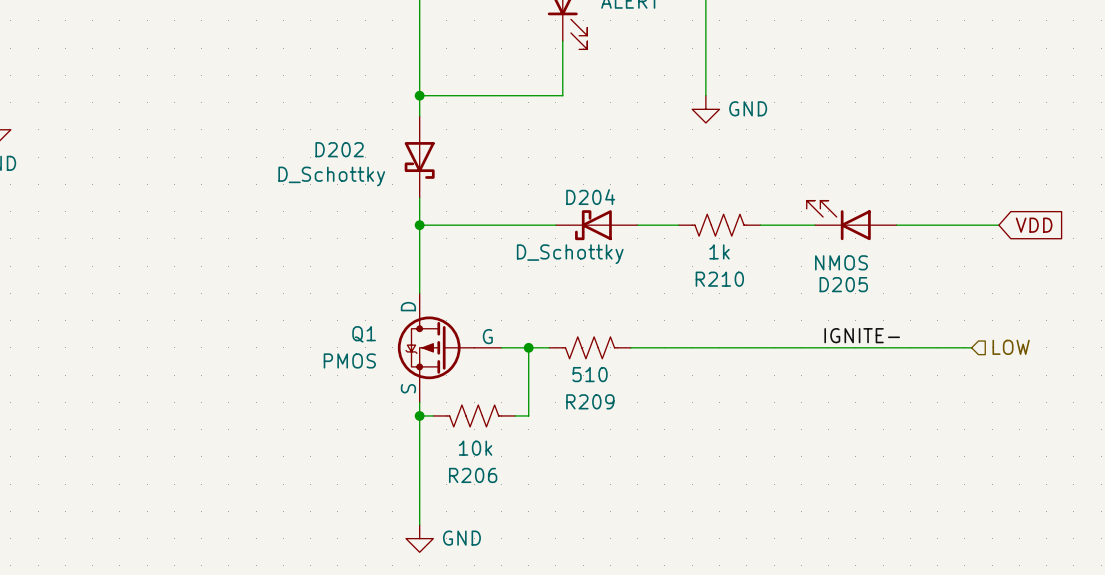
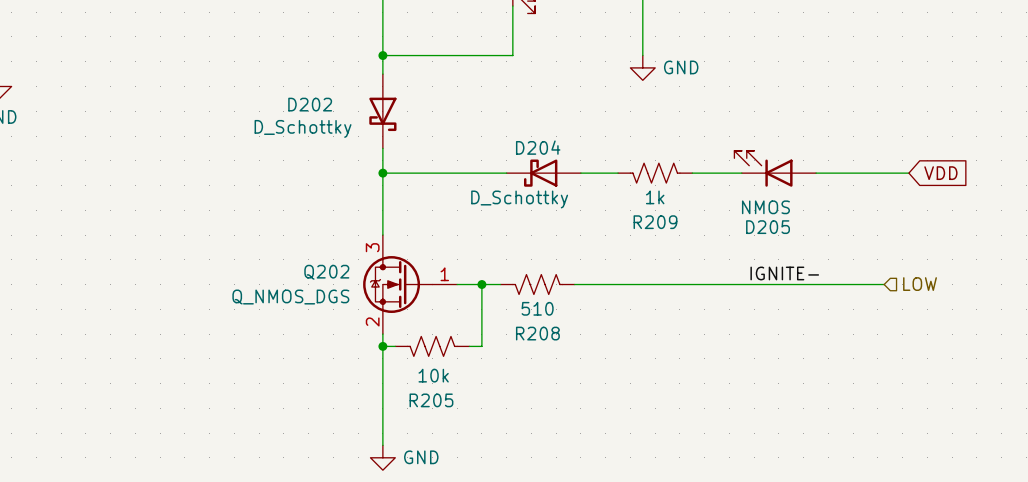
R210 name: R210 (719, 279) -> R209 (655, 222)
Q1: PMOS (449, 347) -> none
Q202: none -> Q_NMOS_DGS (410, 284)
R209 name: R209 (590, 401) -> R208 (537, 333)
R206 name: R206 (473, 475) -> R205 (431, 400)

